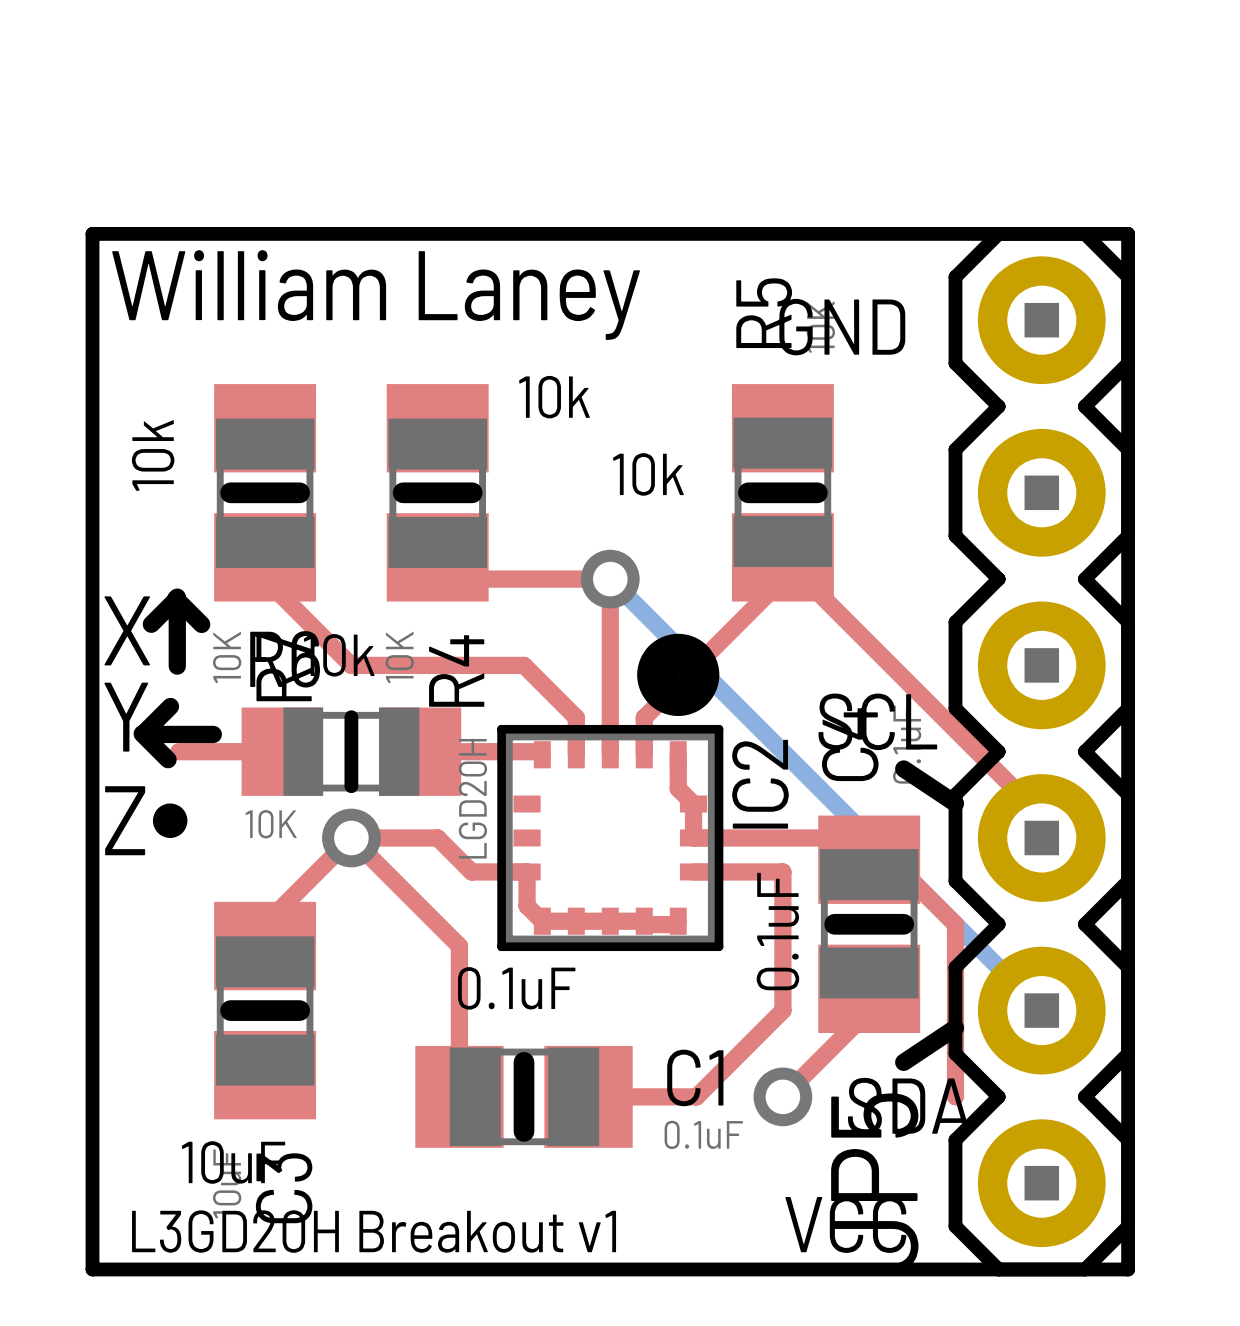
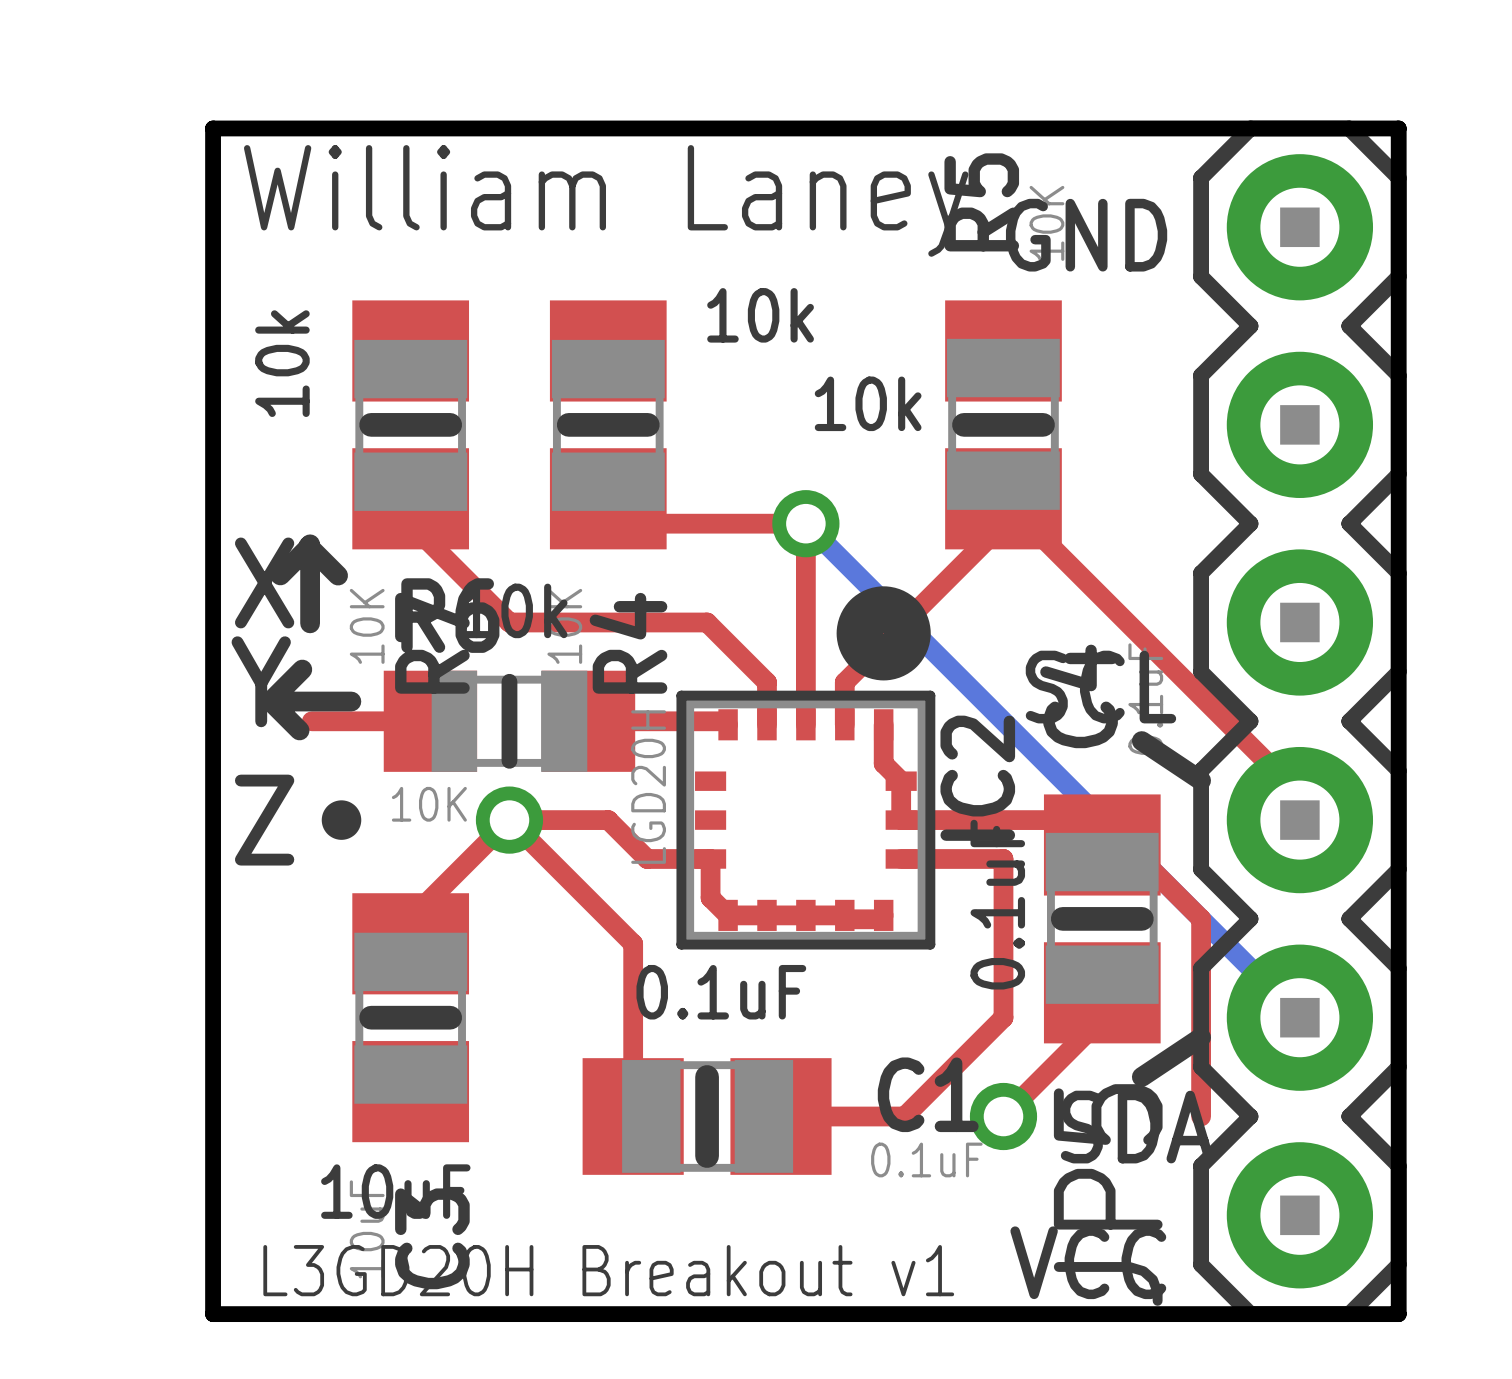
text position: Z (125, 820) -> Z (264, 820)
drawing position: (170, 820) -> (341, 820)

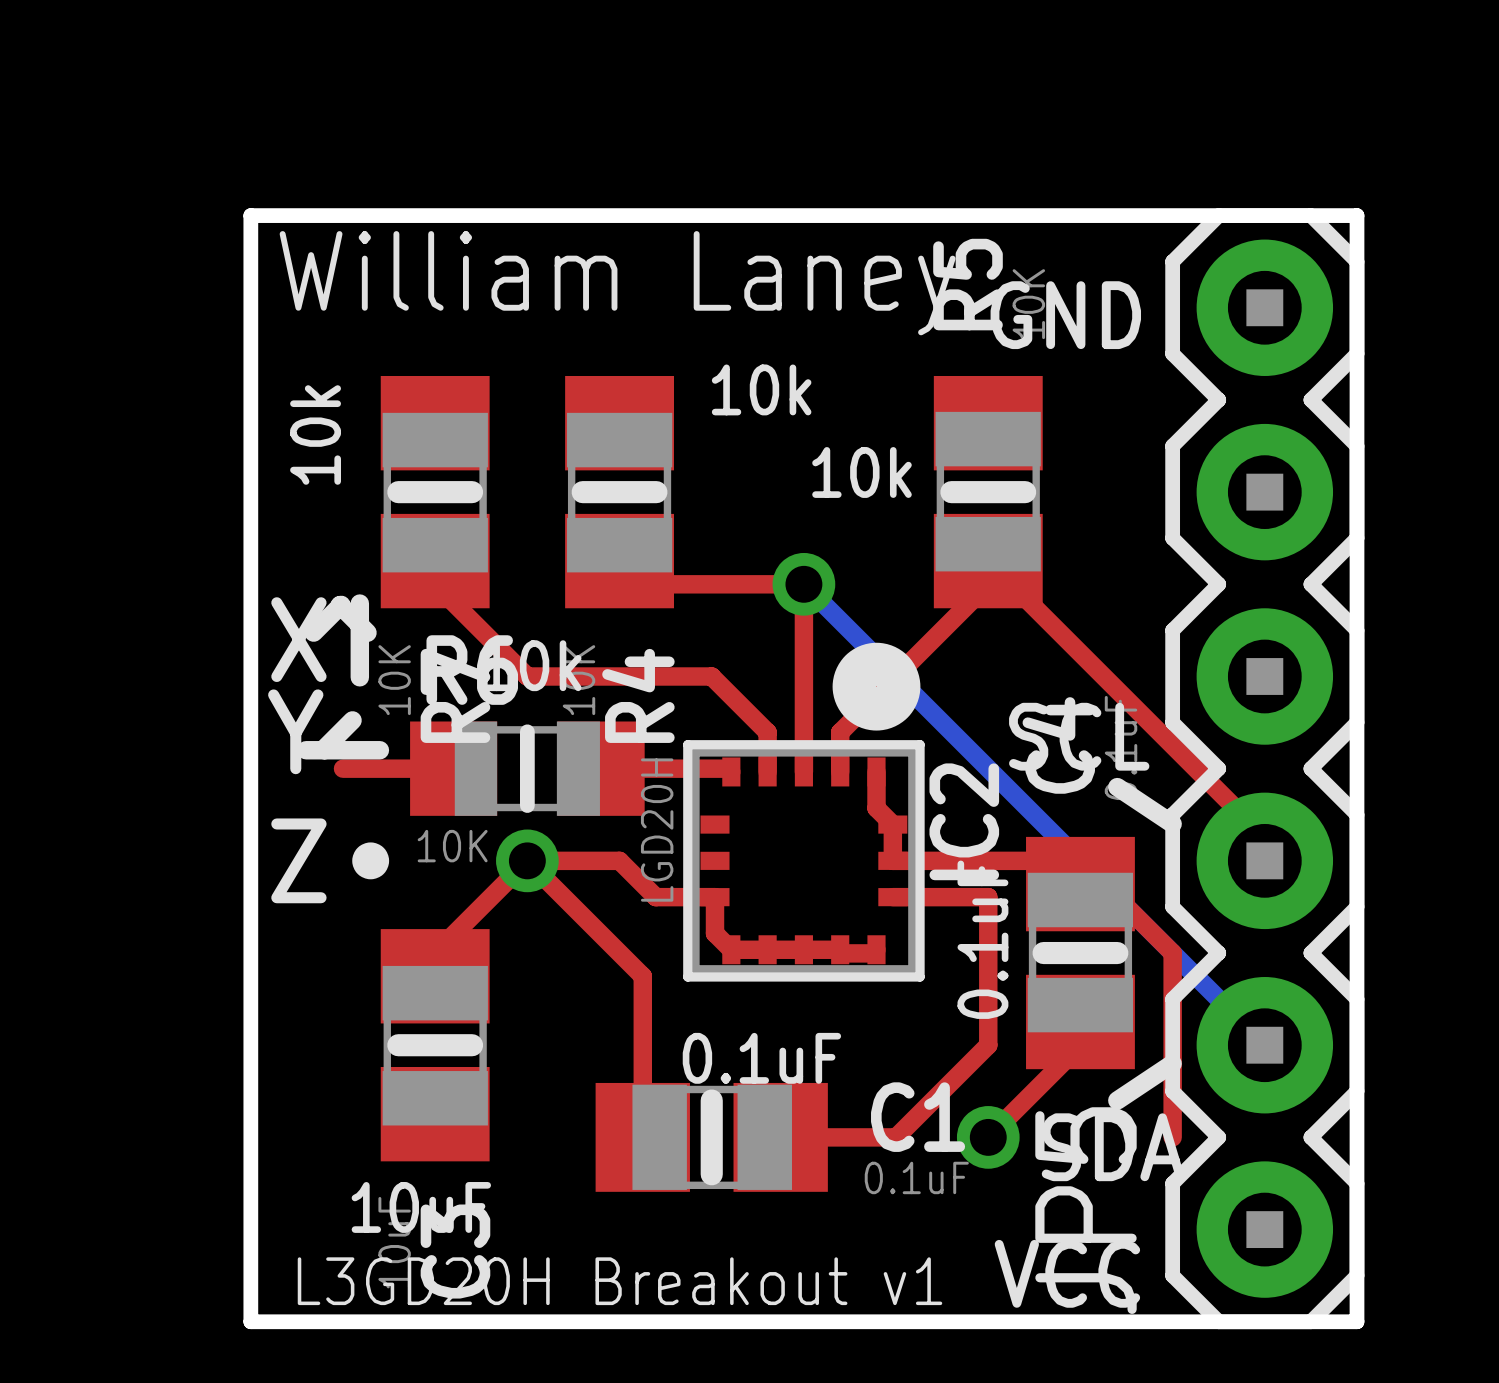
line: (310, 544) (310, 623) -> (359, 603) (359, 677)
line: (302, 669) (272, 699) -> (352, 720) (324, 748)
line: (269, 700) (299, 730) -> none
text position: 0.1uF (721, 992) -> 0.1uF (761, 1058)

